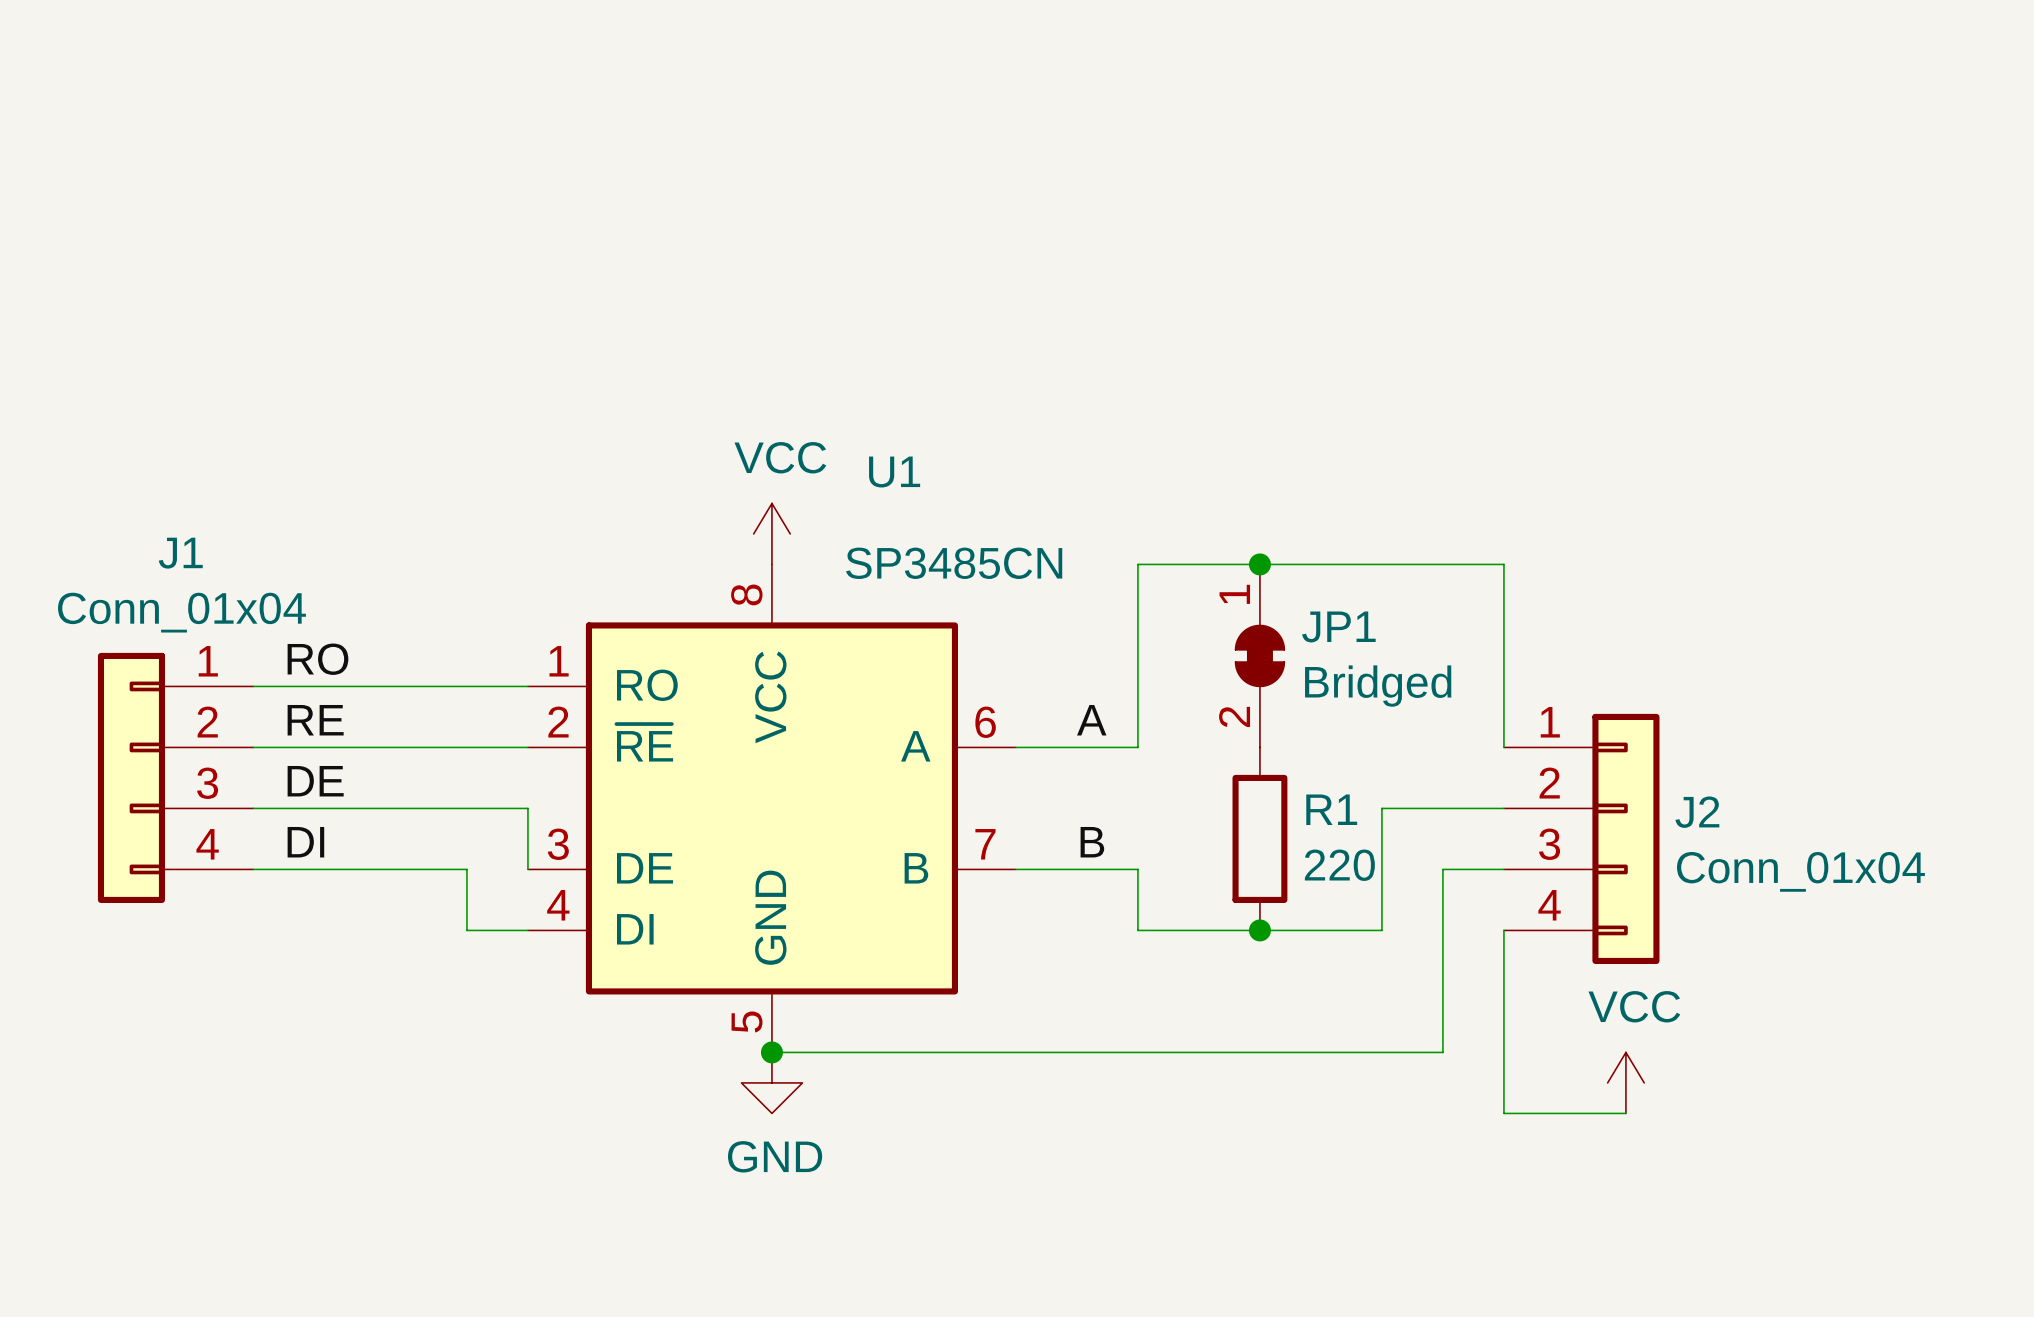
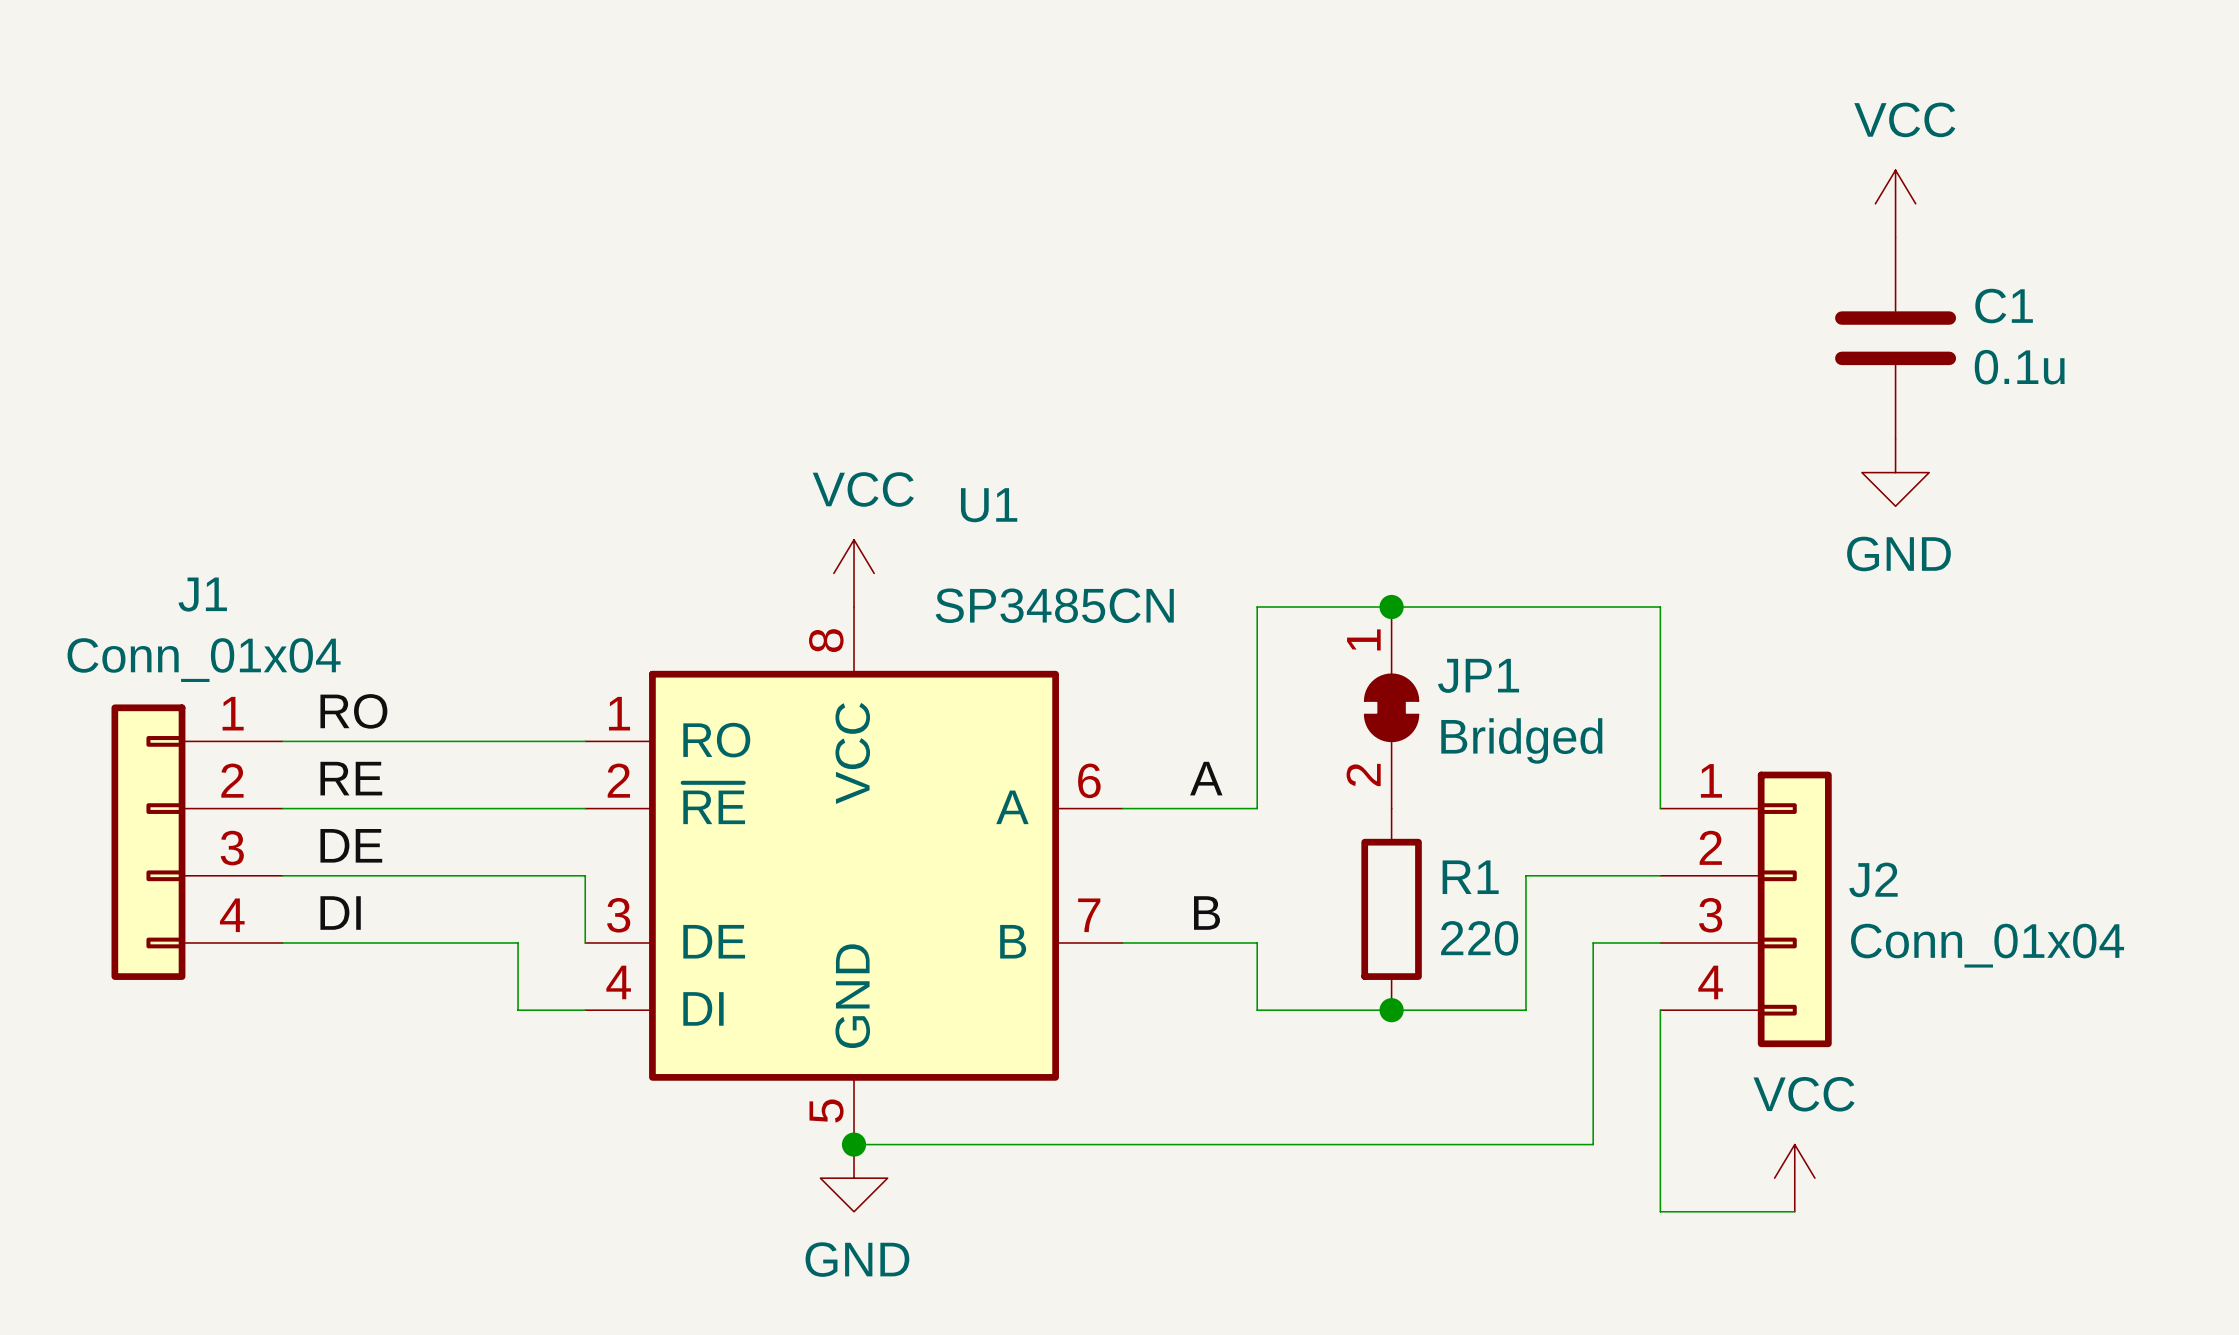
power symbol: none -> VCC (1895, 203)
C1: none -> 0.1u (1895, 338)
power symbol: none -> GND (1895, 472)

